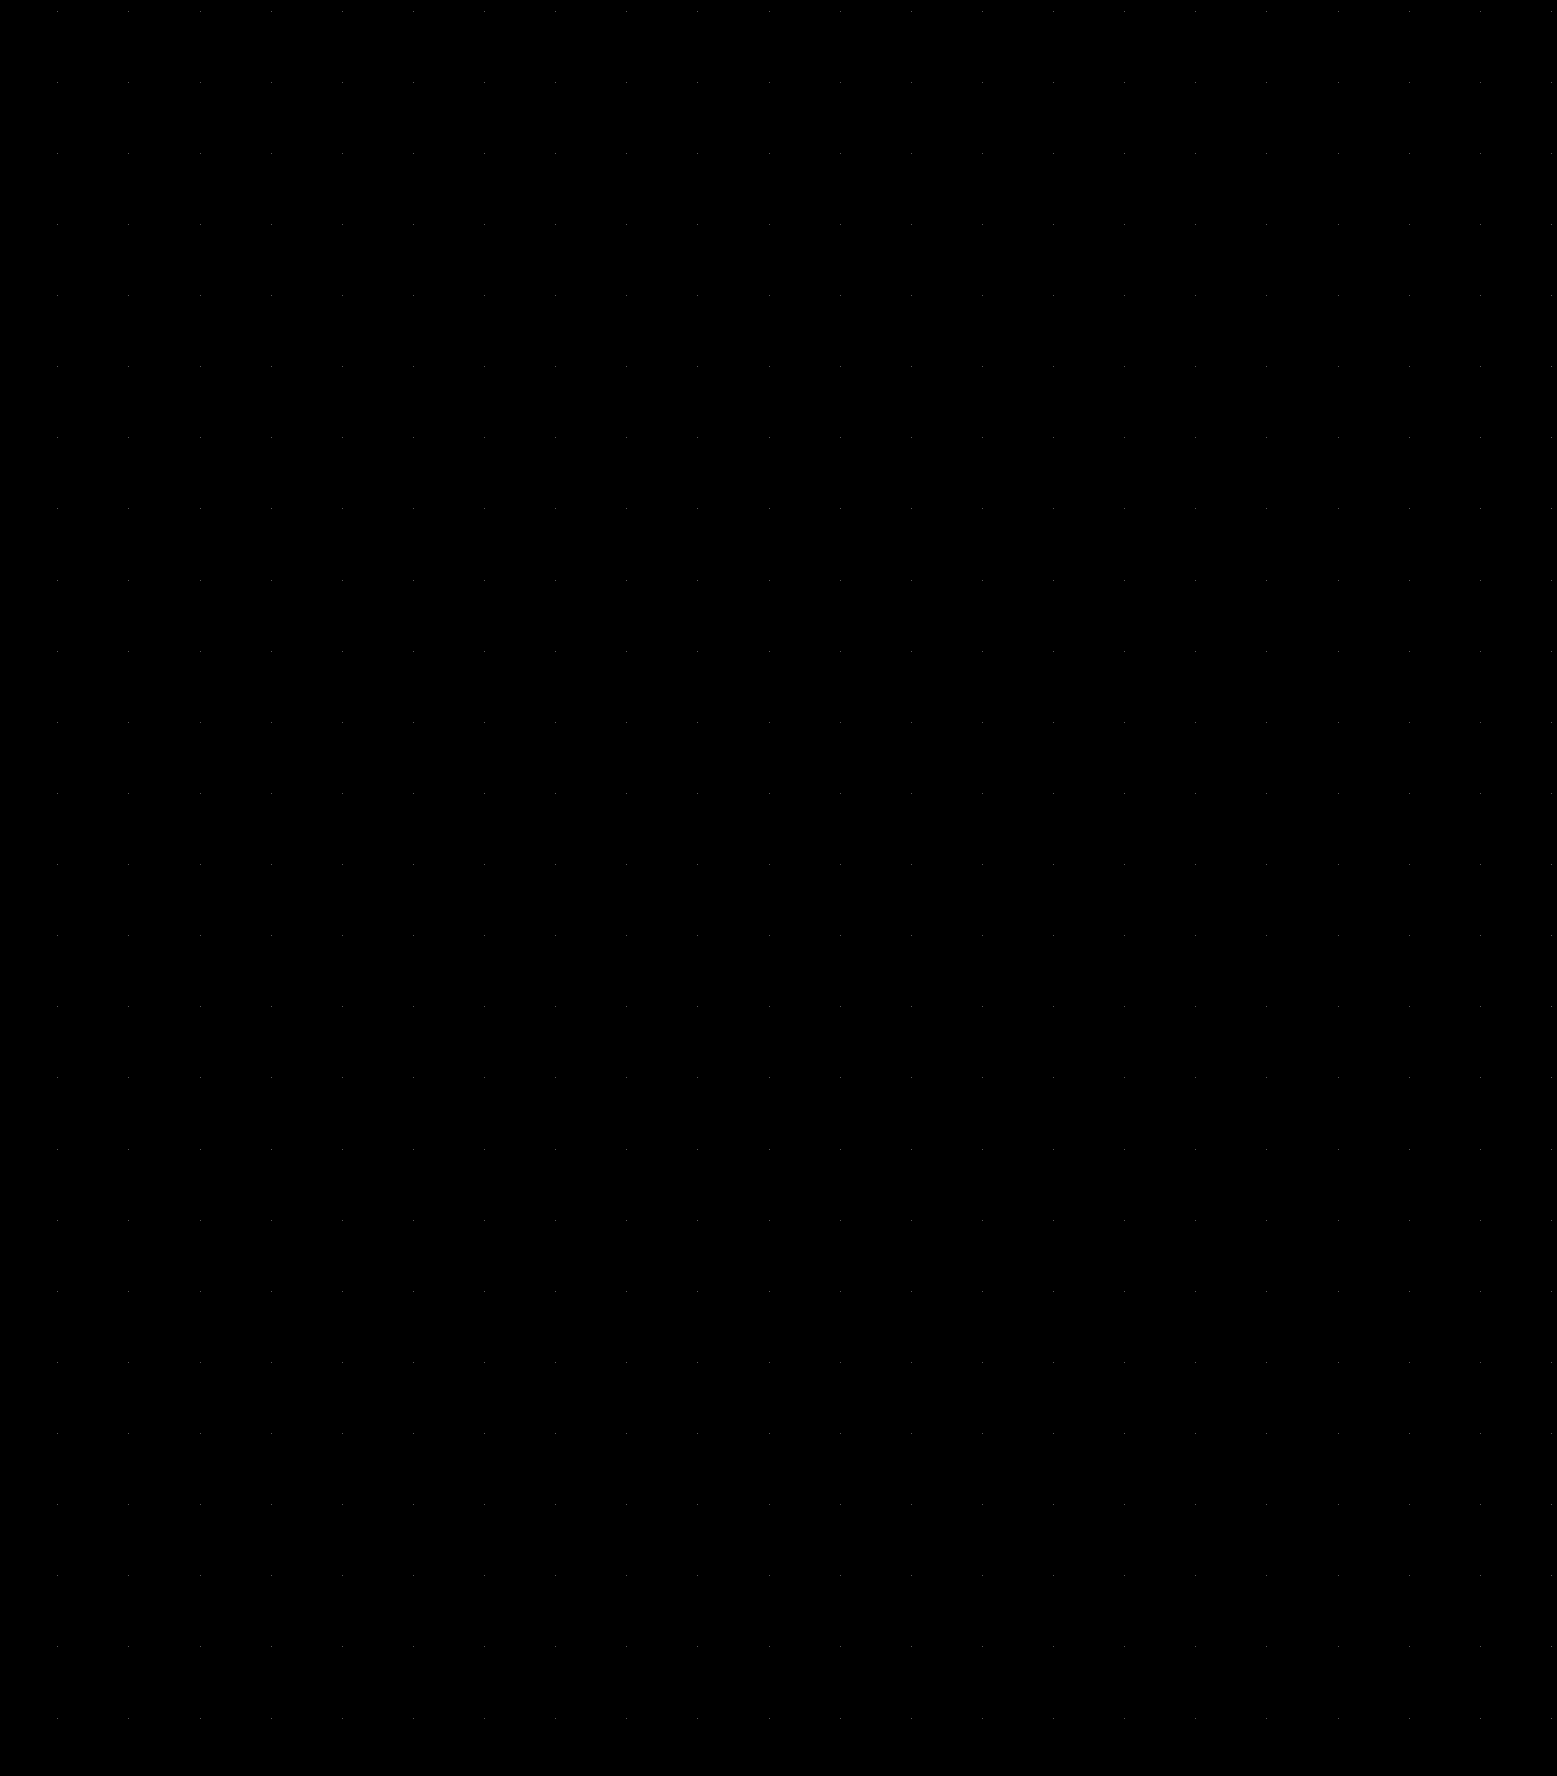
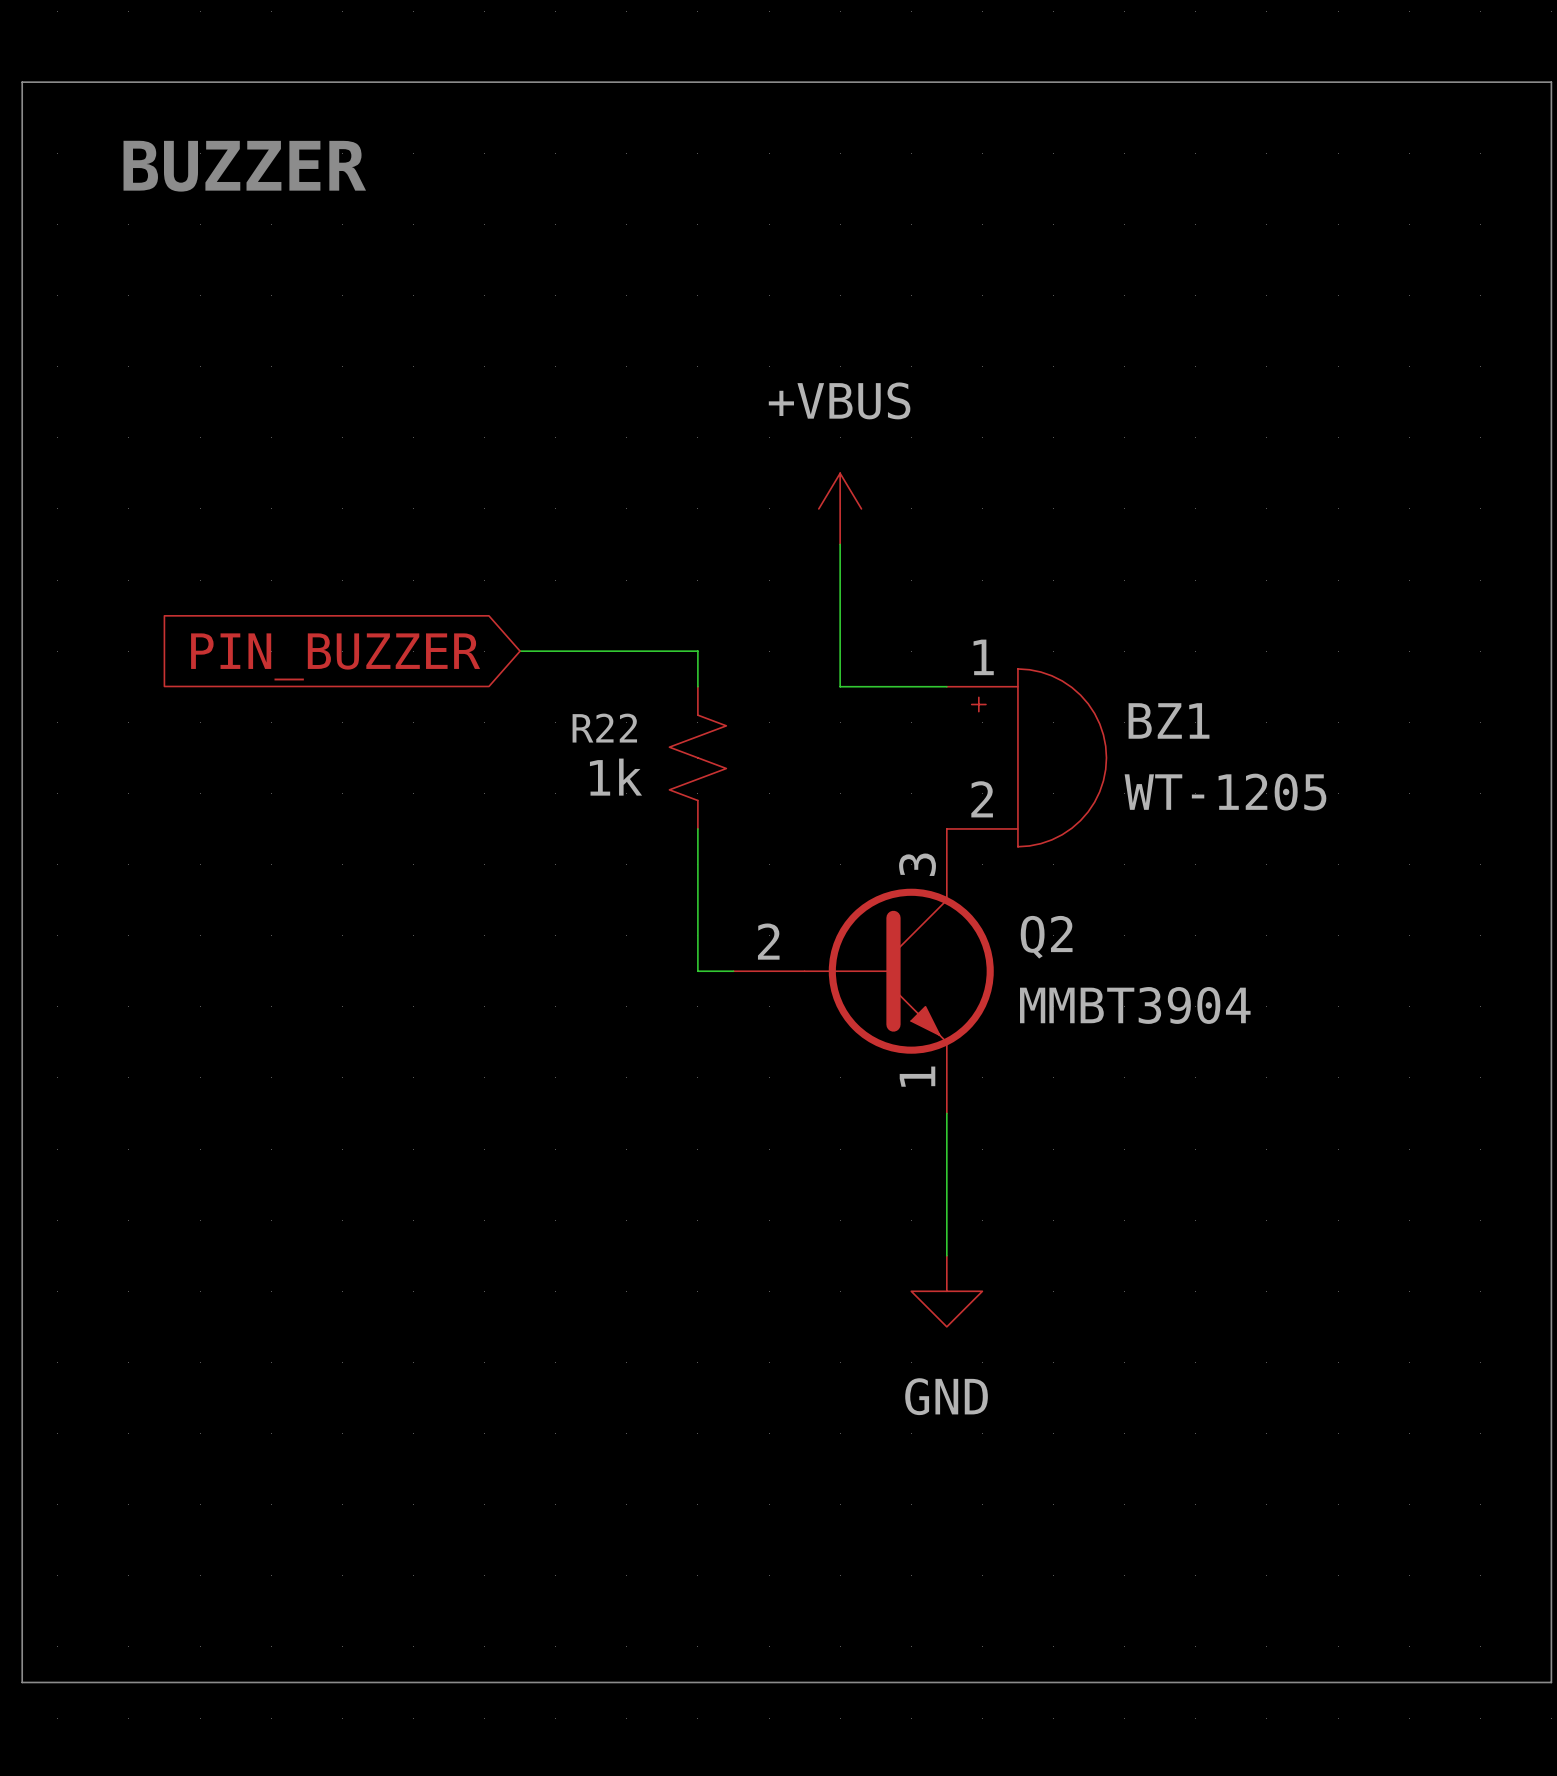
line: none -> (22, 82) (1551, 82) (1551, 1682) (22, 1682) (22, 82)
text: none -> BUZZER (244, 166)
power symbol: none -> +VBUS (840, 508)
wire: none -> (840, 544) (840, 686) (946, 686)
wire: none -> (520, 651) (697, 651) (697, 686)
global label: none -> PIN_BUZZER (335, 656)
R22: none -> 1k (697, 757)
BZ1: none -> WT-1205 (1026, 757)
wire: none -> (697, 828) (697, 971) (733, 971)
Q2: none -> MMBT3904 (863, 971)
wire: none -> (946, 1113) (946, 1255)
power symbol: none -> GND (946, 1291)

